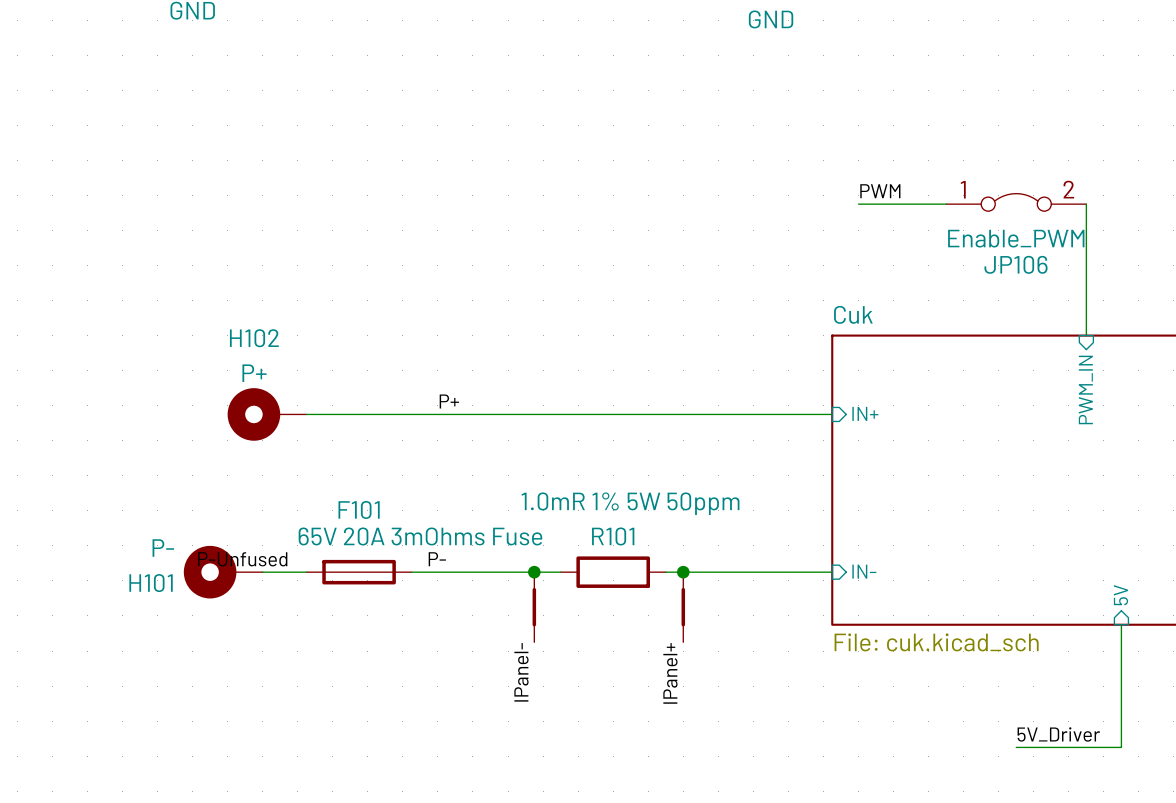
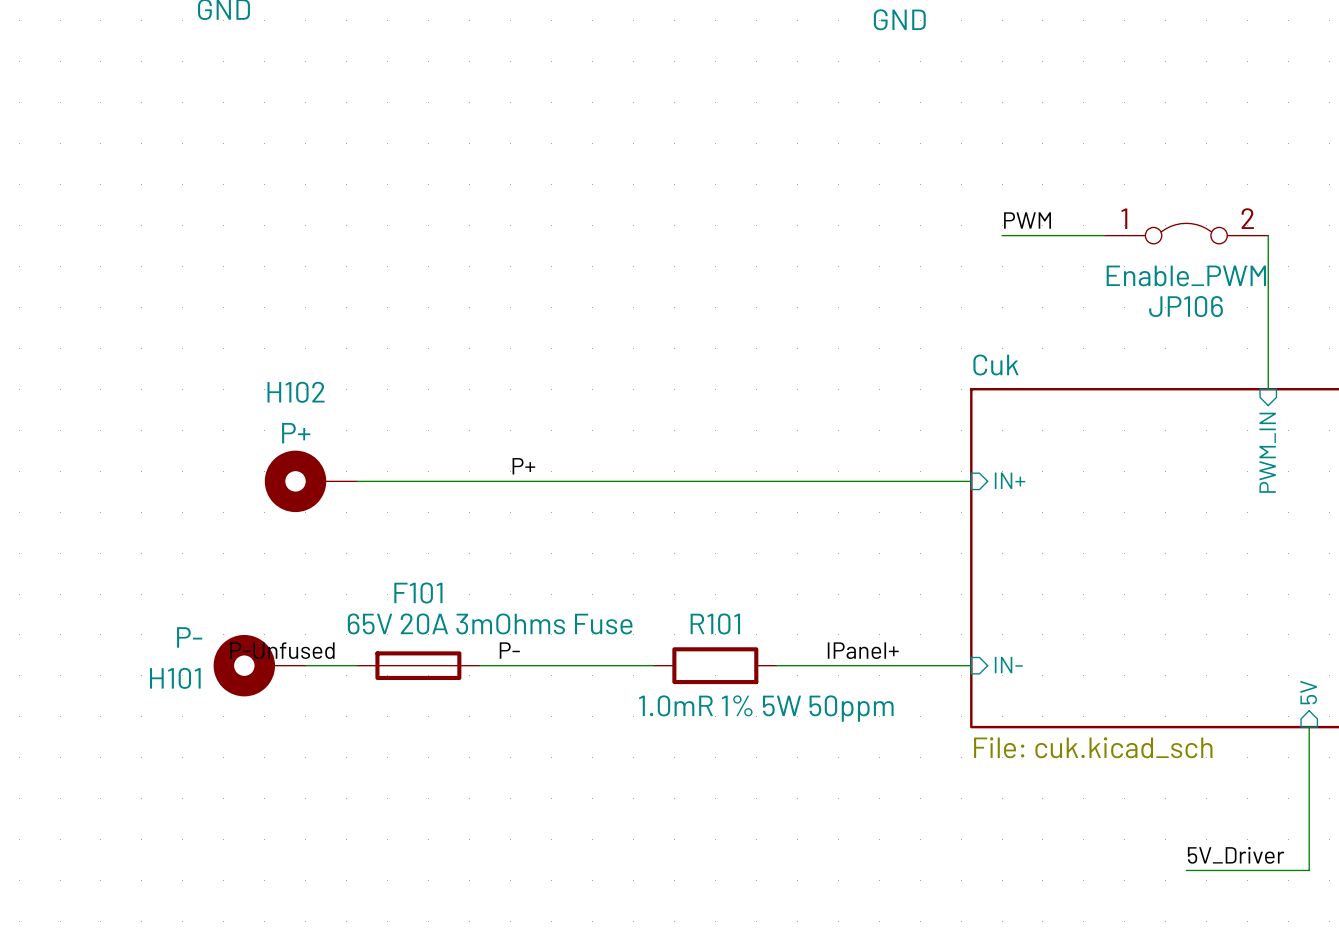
R101 value position: 1.0mR 1% 5W 50ppm (630, 503) -> 1.0mR 1% 5W 50ppm (766, 708)
junction: (534, 572) -> none
junction: (683, 572) -> none
part: (534, 607) -> none
part: (683, 607) -> none
label: IPanel- (521, 672) -> none
label rotation: 0° (670, 673) -> 90° clockwise (863, 650)
label position: IPanel+ (670, 673) -> IPanel+ (863, 650)

